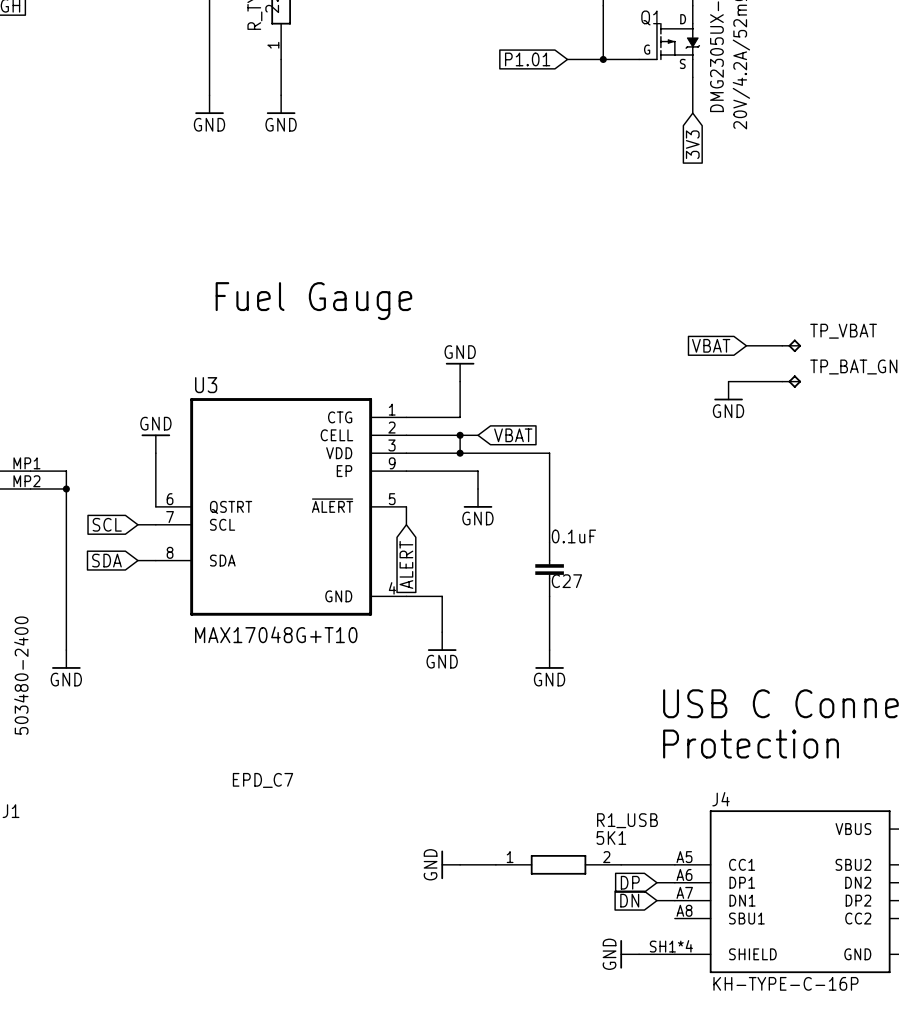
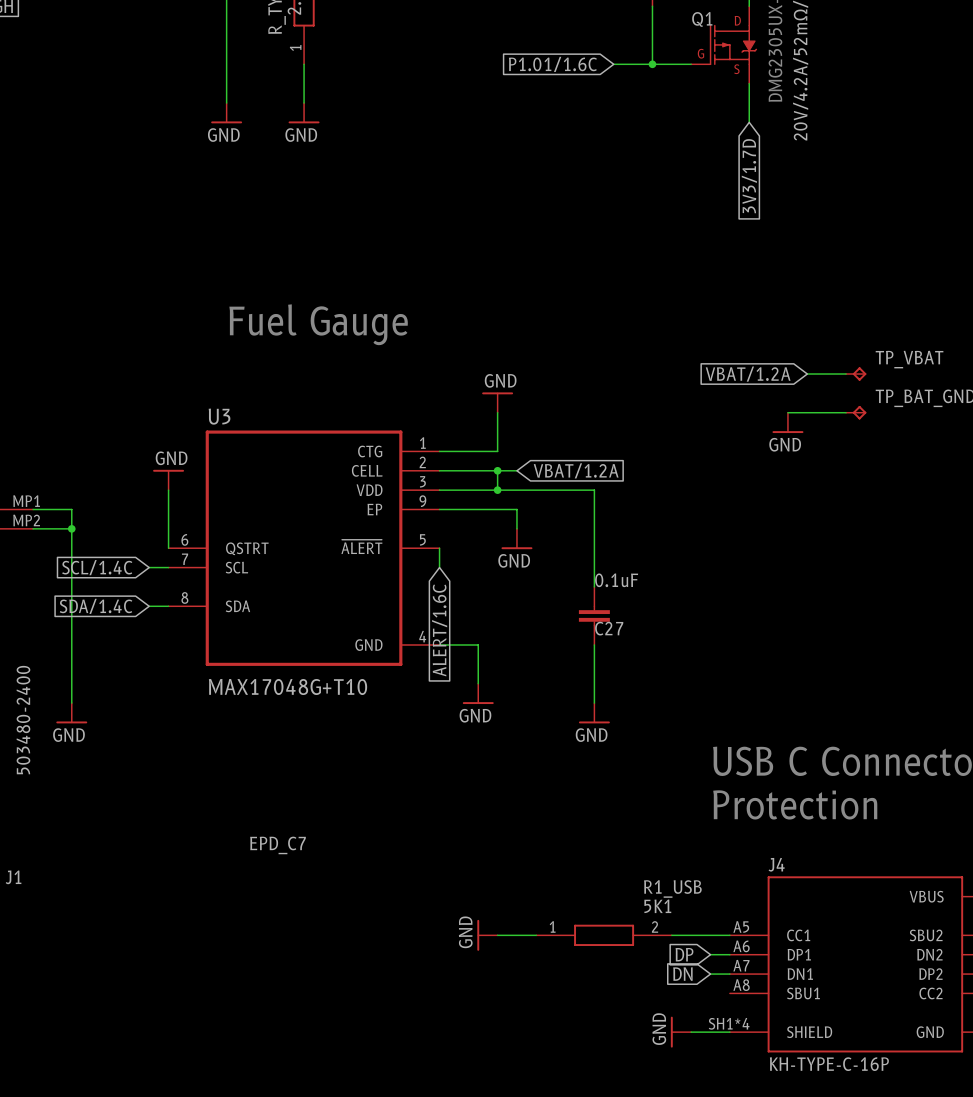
global label: P1.01 (527, 59) -> P1.01/1.6C (552, 64)
global label: 3V3 (692, 144) -> 3V3/1.7D (749, 176)
global label: VBAT (711, 345) -> VBAT/1.2A (748, 374)
global label: VBAT (513, 435) -> VBAT/1.2A (576, 470)
global label: SCL (107, 524) -> SCL/1.4C (97, 567)
global label: SDA (106, 560) -> SDA/1.4C (96, 606)
global label: ALERT (406, 564) -> ALERT/1.6C (439, 630)

